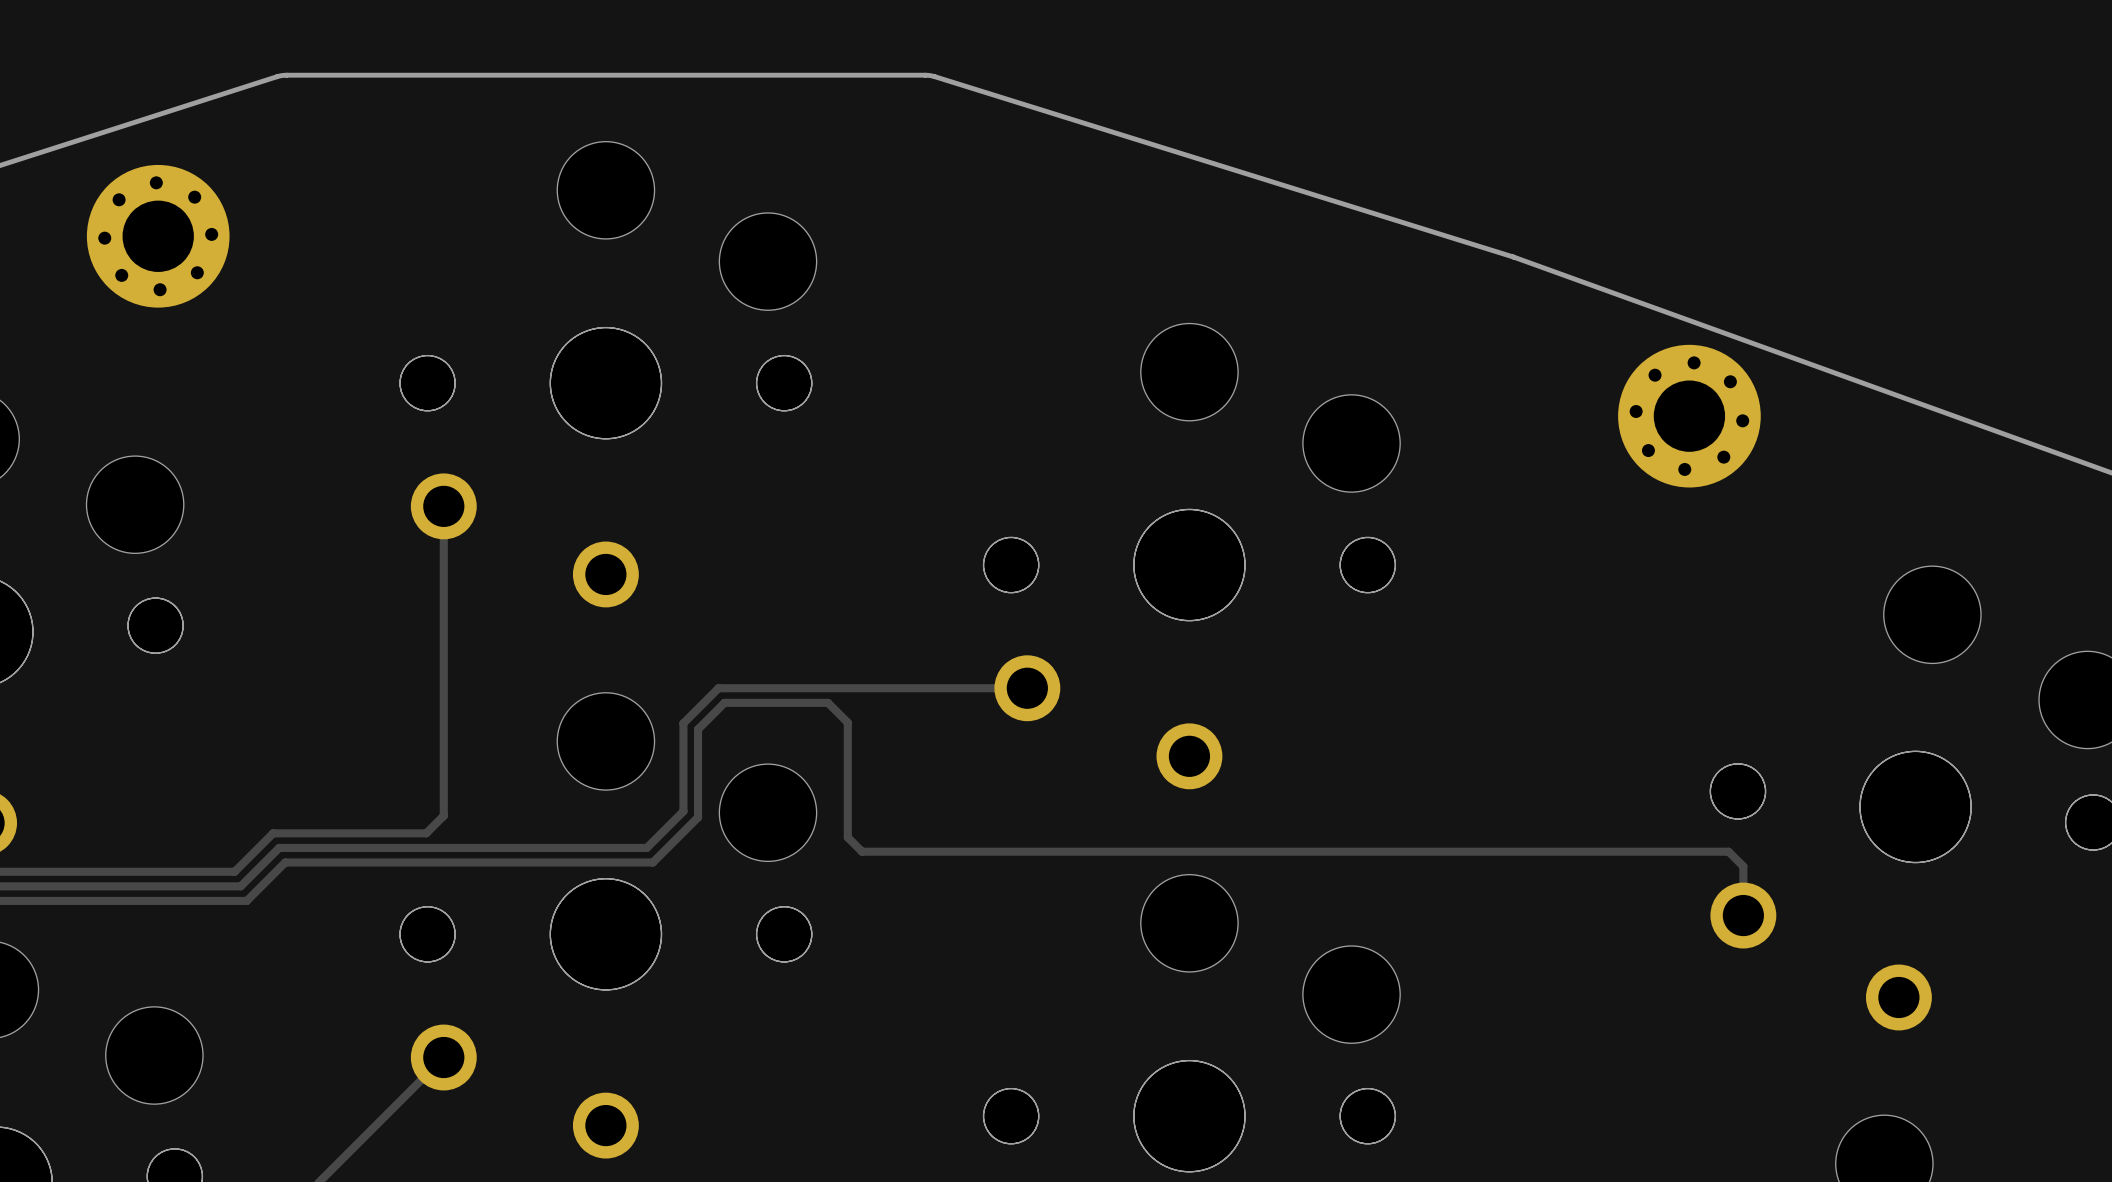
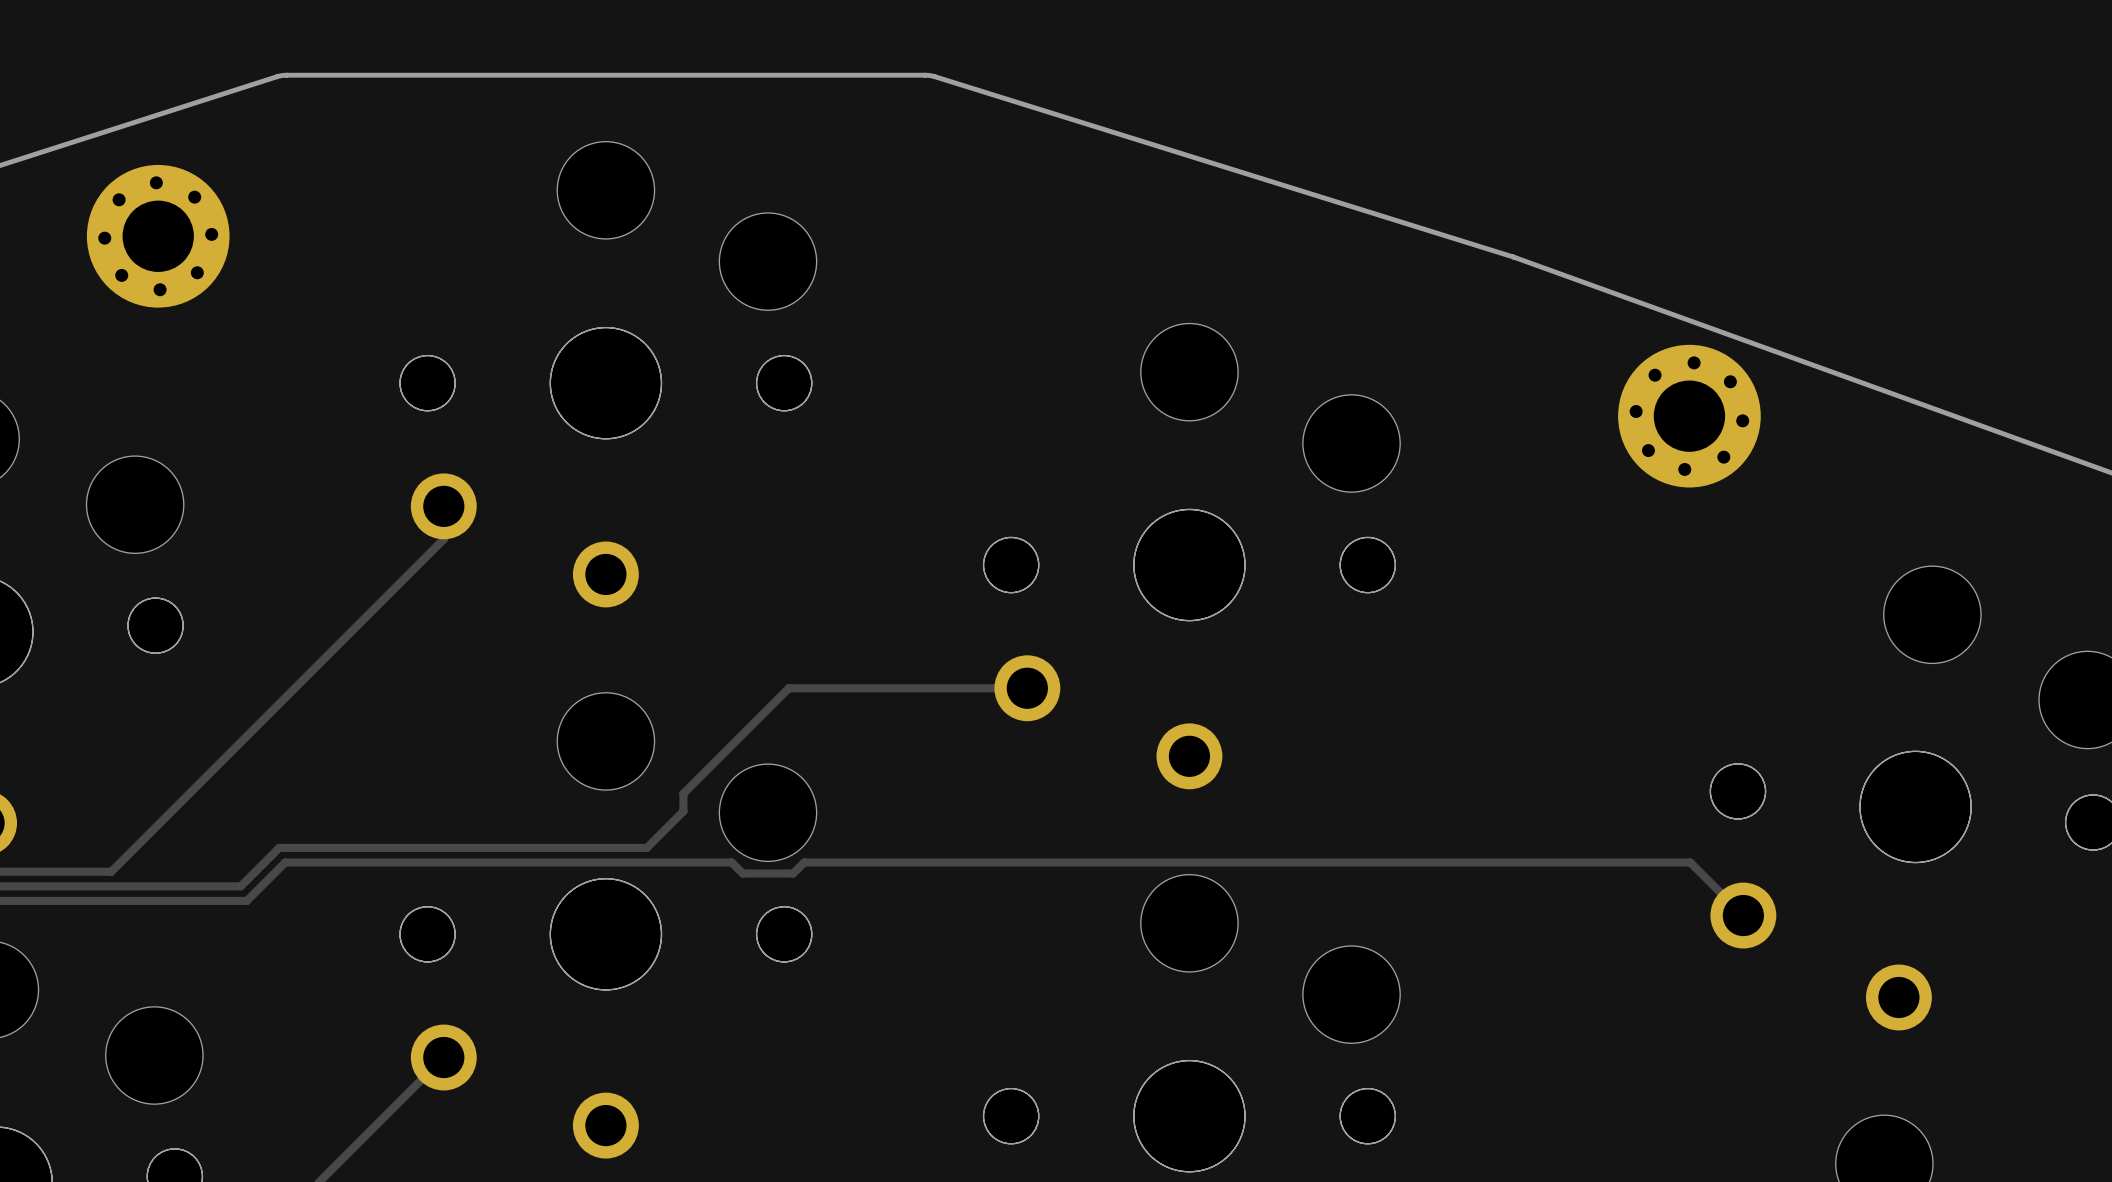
track: (443, 539) (443, 815) (426, 833) (273, 833) (234, 871) (111, 871) -> (443, 539) (111, 871)
track: (788, 688) (718, 688) (683, 723) (683, 793) -> (788, 688) (683, 793)
track: (652, 862) (698, 817) (698, 729) (724, 702) (827, 702) (847, 722) (847, 837) (862, 851) (1728, 851) (1743, 866) (1743, 915) -> (652, 862) (731, 862) (742, 873) (793, 873) (804, 862) (1690, 862) (1743, 915)

